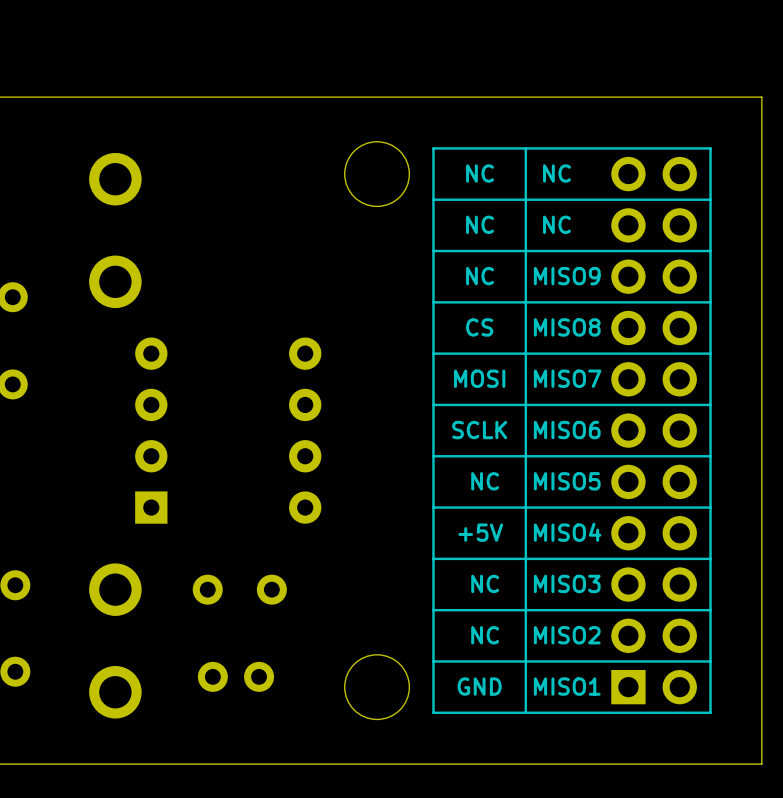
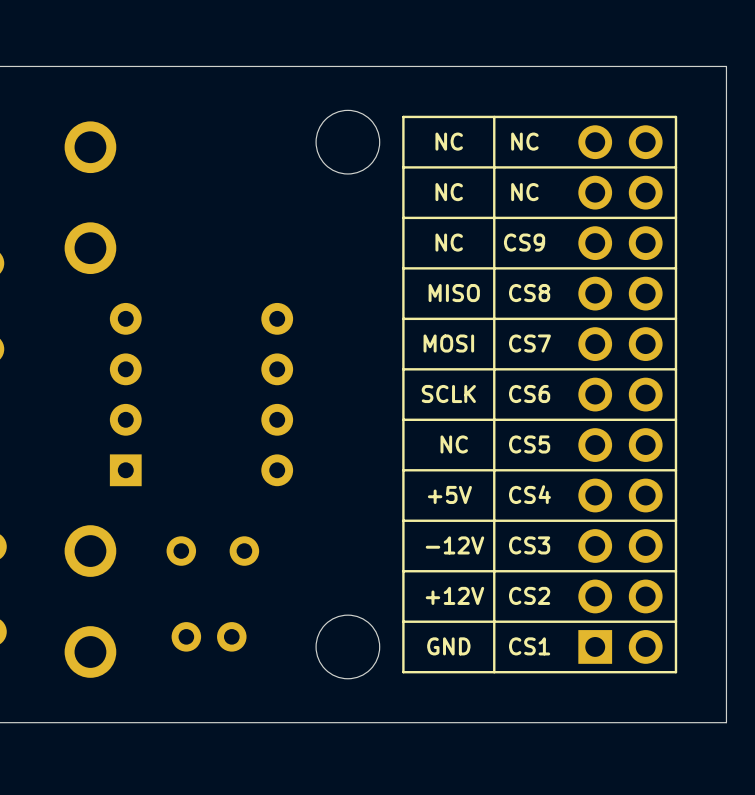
text: MISO9 (567, 276) -> CS9 (524, 242)
text: CS (479, 327) -> MISO (454, 293)
text: MISO8 (567, 327) -> CS8 (529, 293)
text: MISO7 (567, 378) -> CS7 (529, 343)
text: MISO6 (567, 430) -> CS6 (529, 393)
text: MISO5 (567, 481) -> CS5 (529, 444)
text: MISO4 (567, 532) -> CS4 (529, 494)
text: NC (485, 583) -> -12V (454, 545)
text: MISO3 (567, 583) -> CS3 (529, 545)
text: NC (485, 635) -> +12V (454, 595)
text: MISO2 (567, 635) -> CS2 (529, 595)
text: MISO1 (567, 686) -> CS1 (529, 646)

